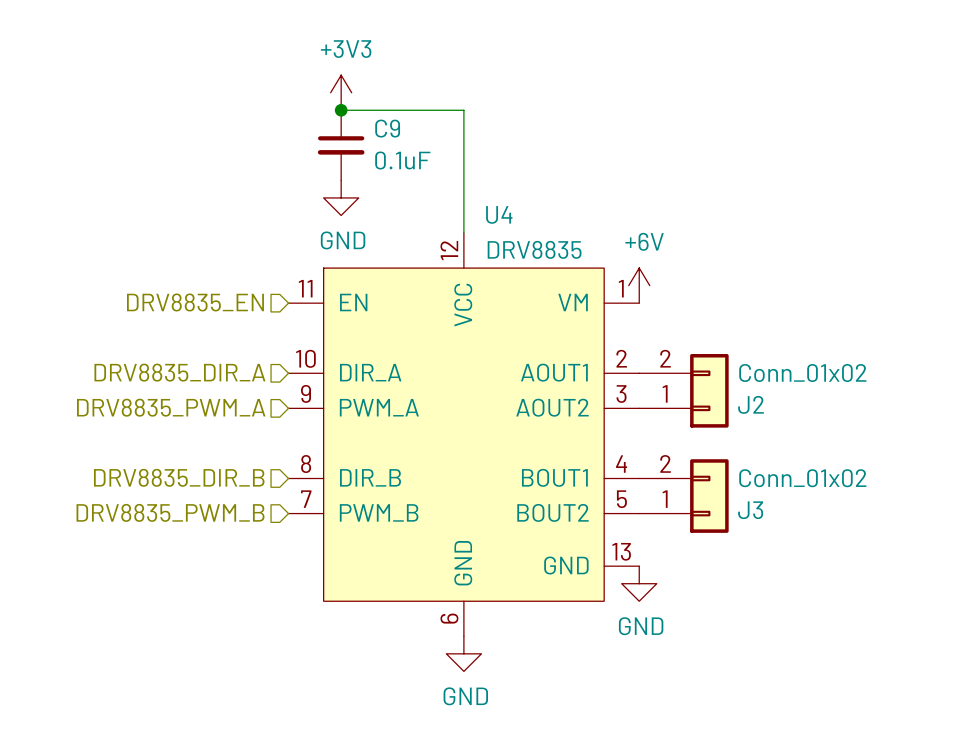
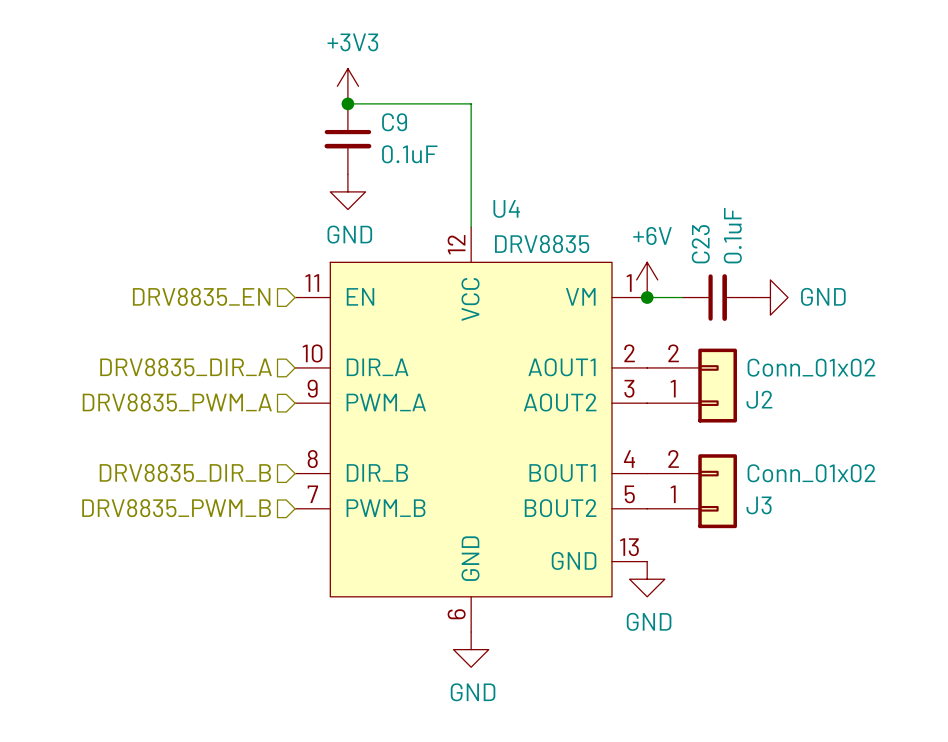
wire: none -> (647, 297) (682, 297)
junction: none -> (647, 297)
C23: none -> 0.1uF (717, 297)
power symbol: none -> GND (770, 297)

